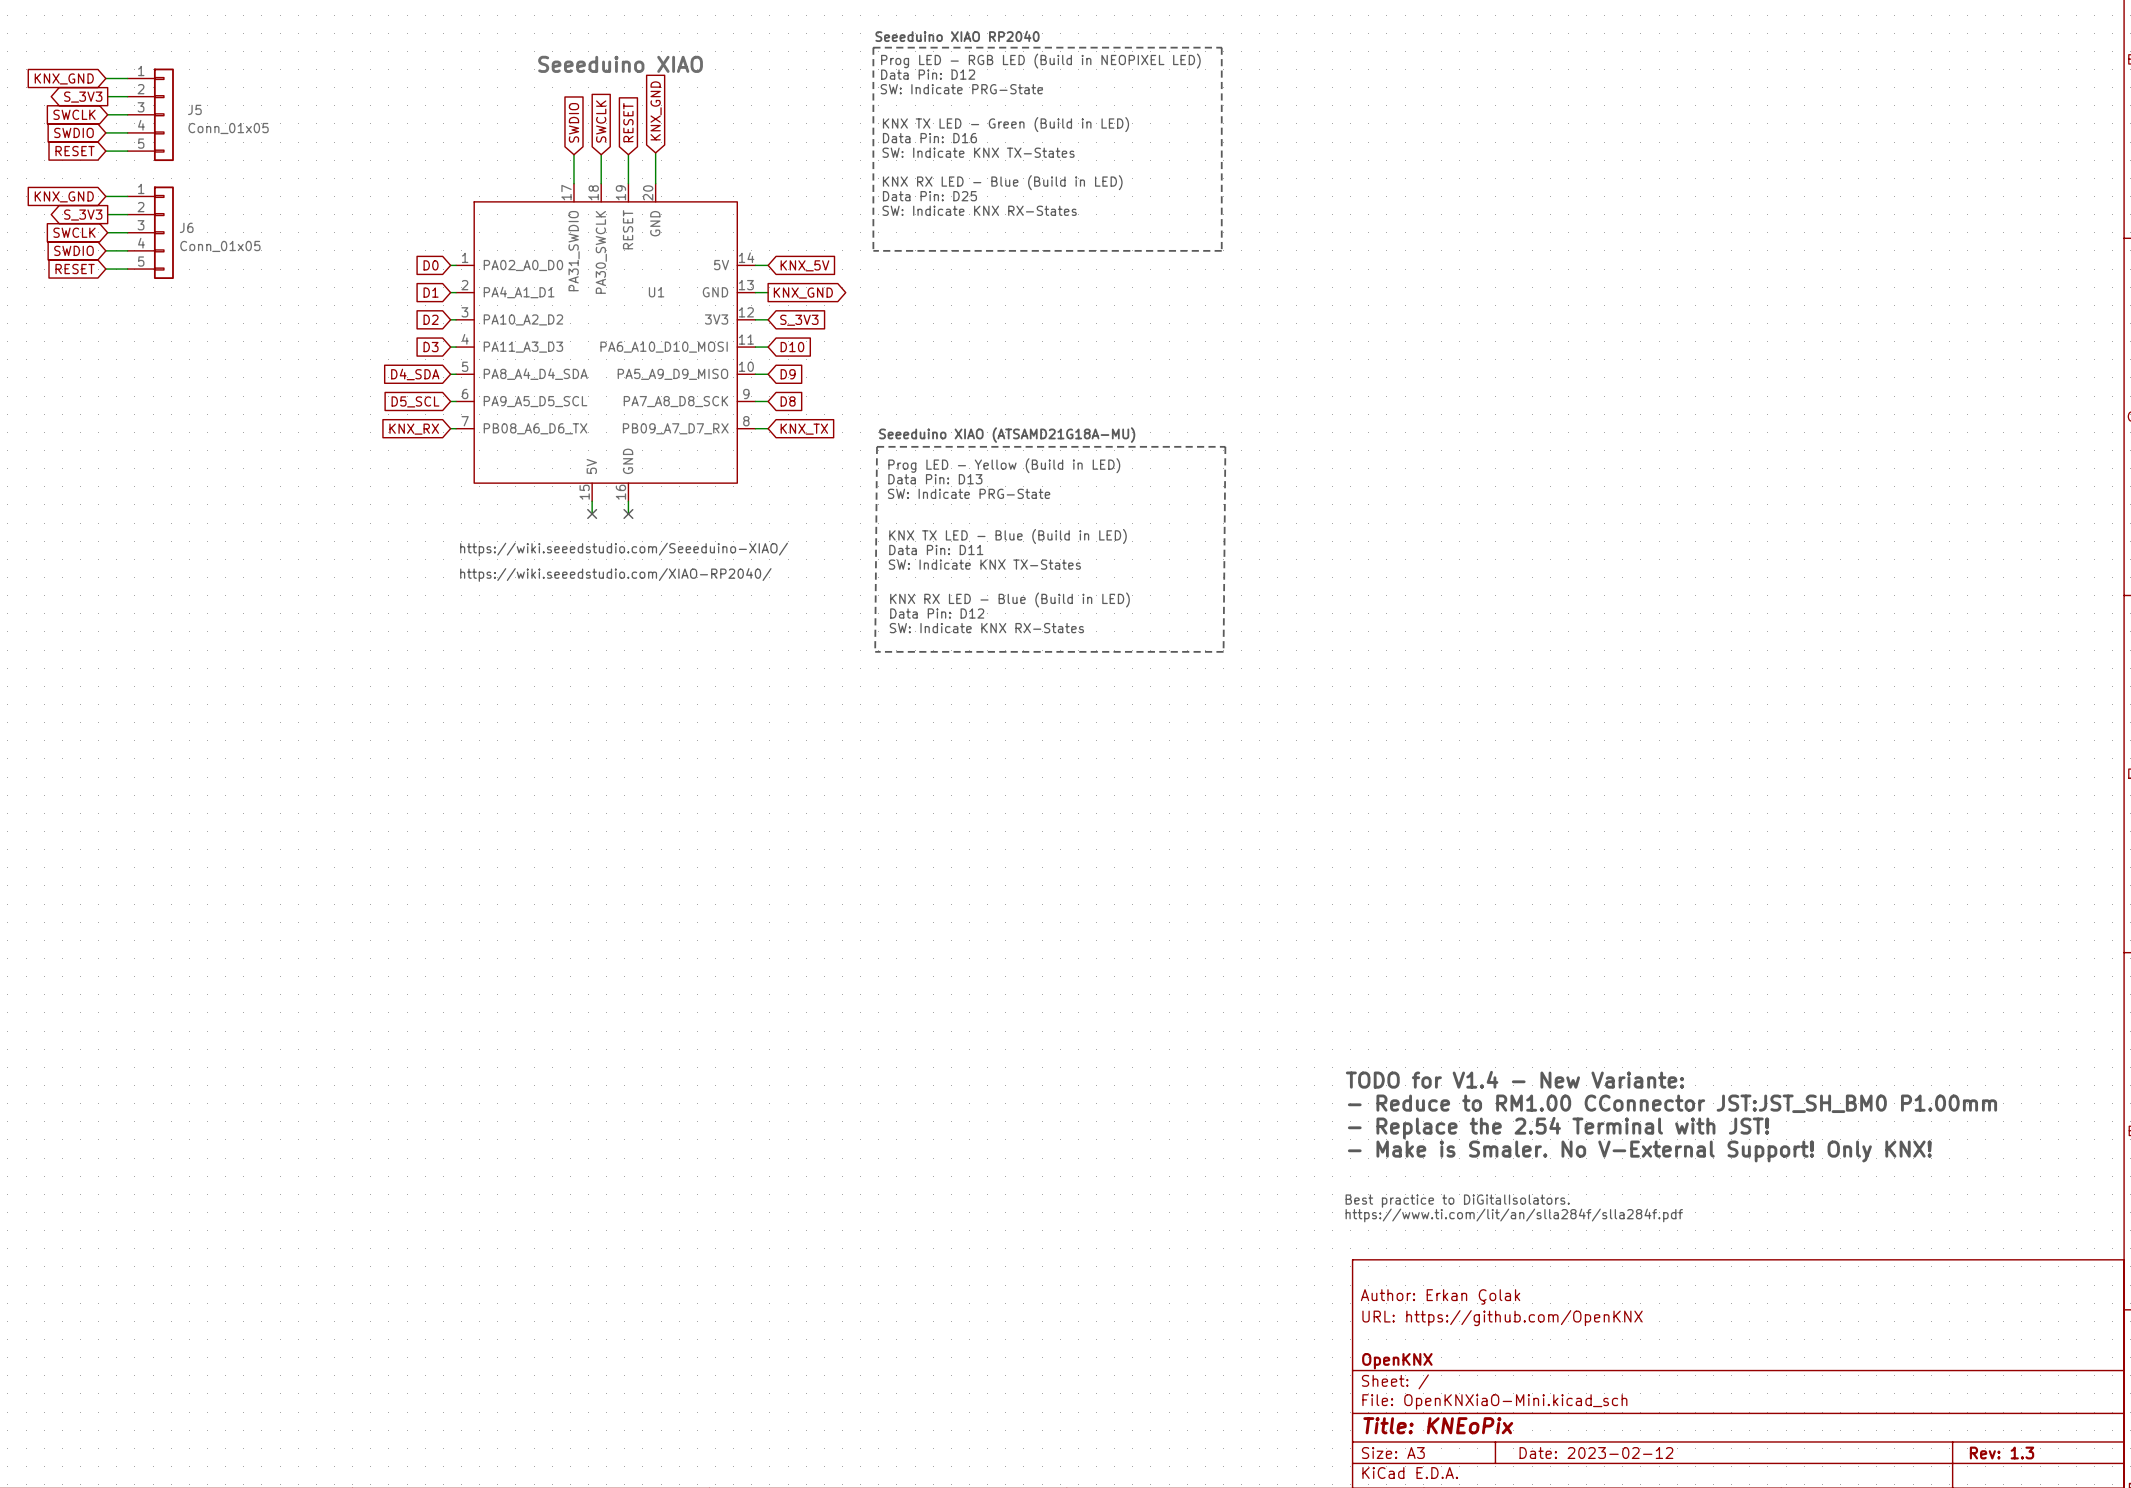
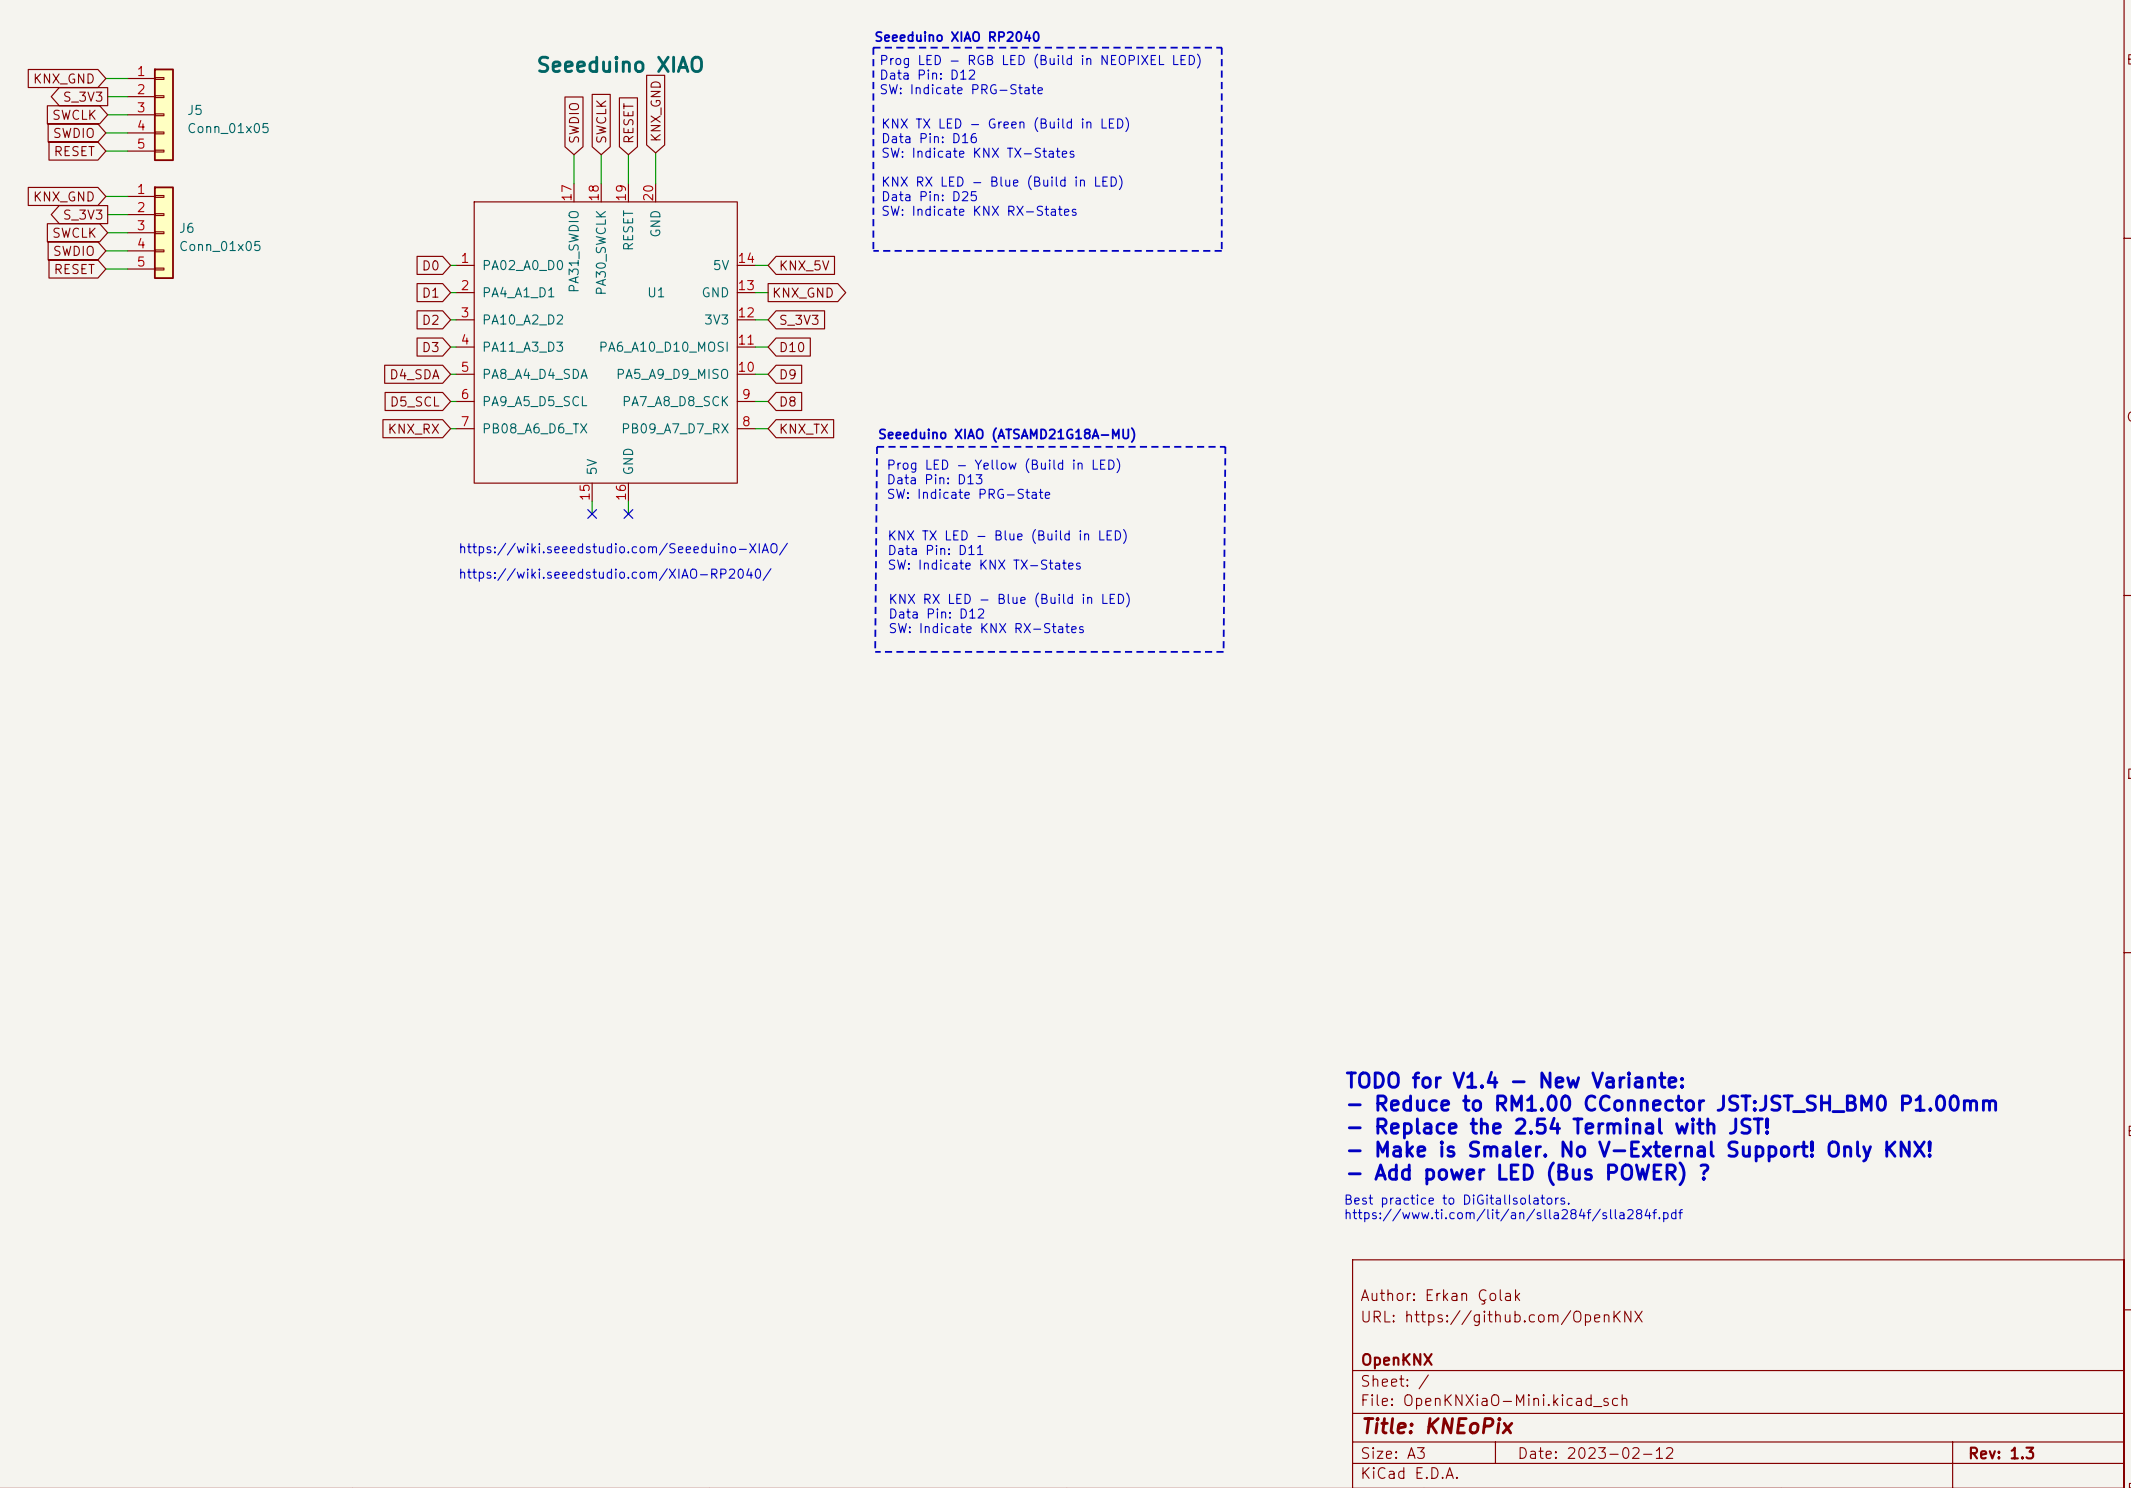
text: none -> - Add power LED (Bus POWER) ? (1528, 1173)

